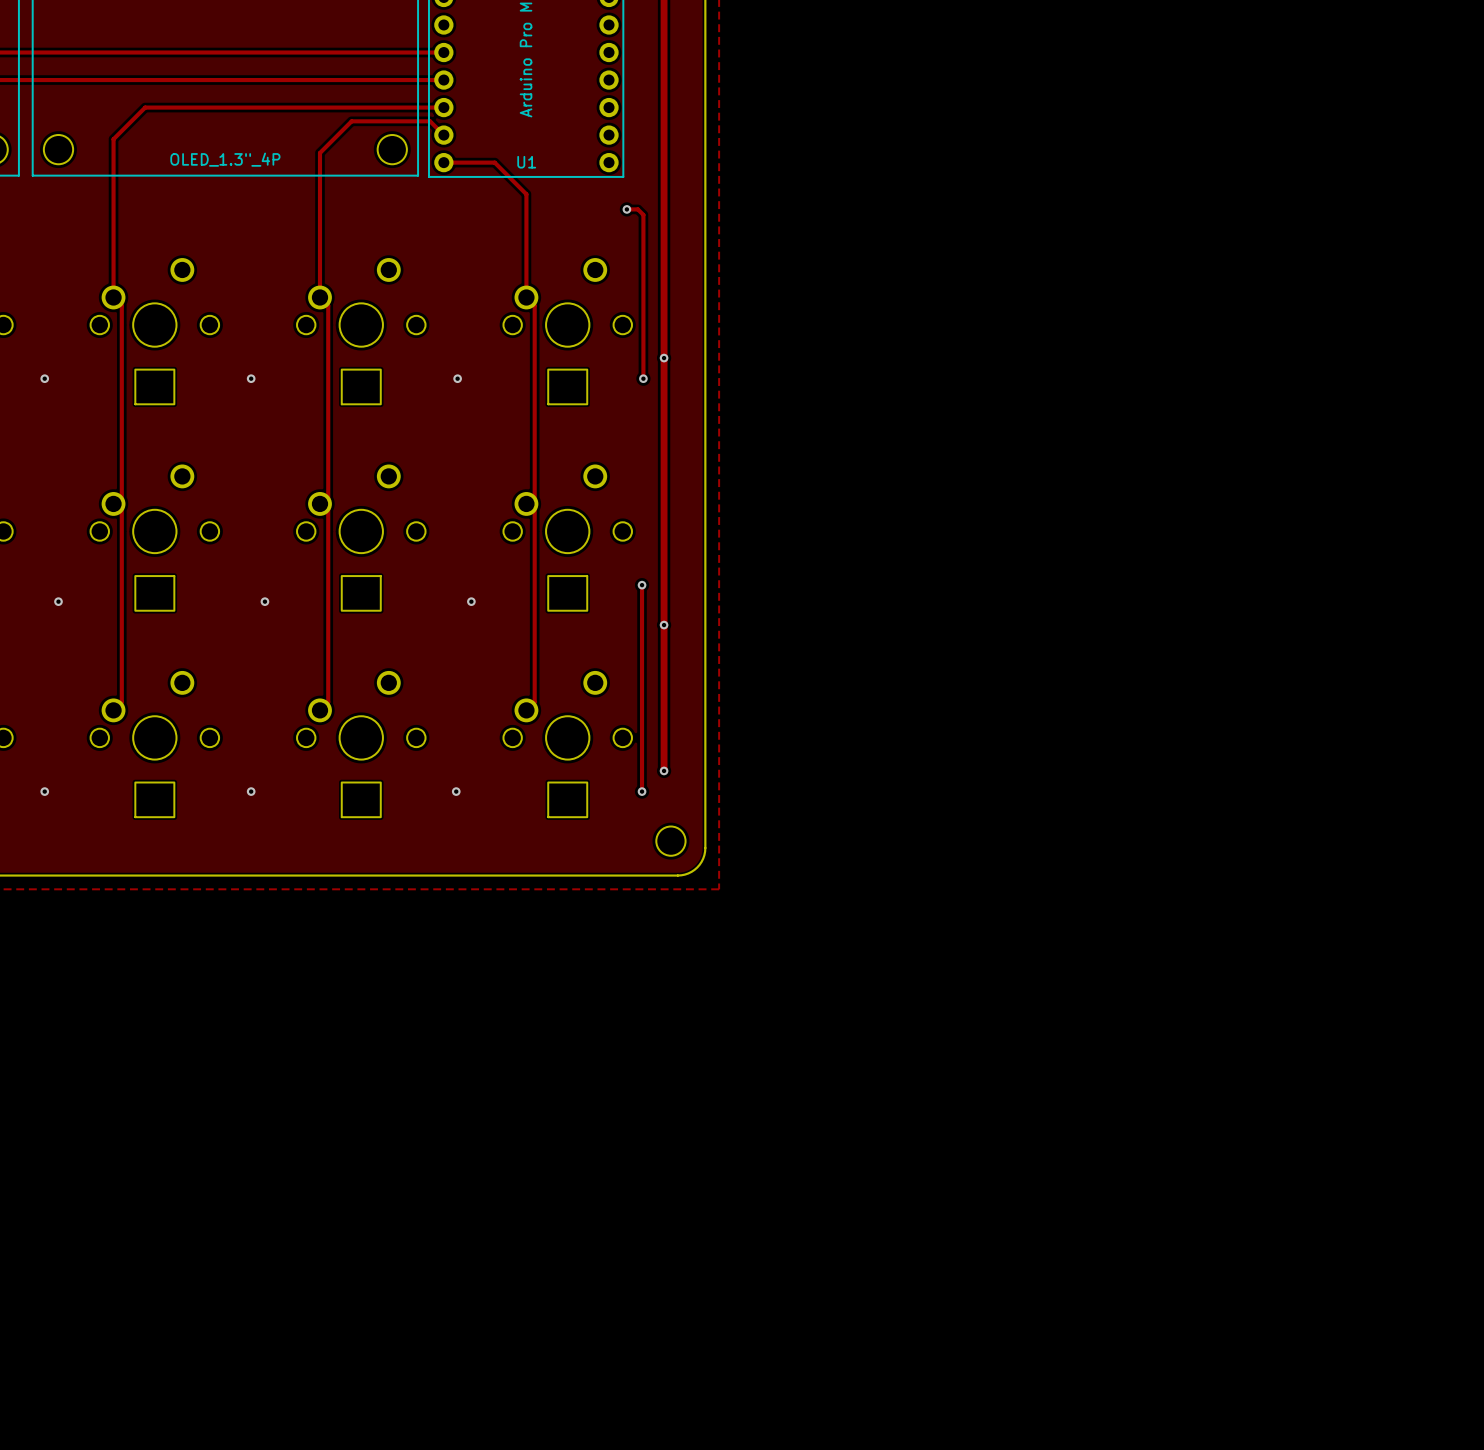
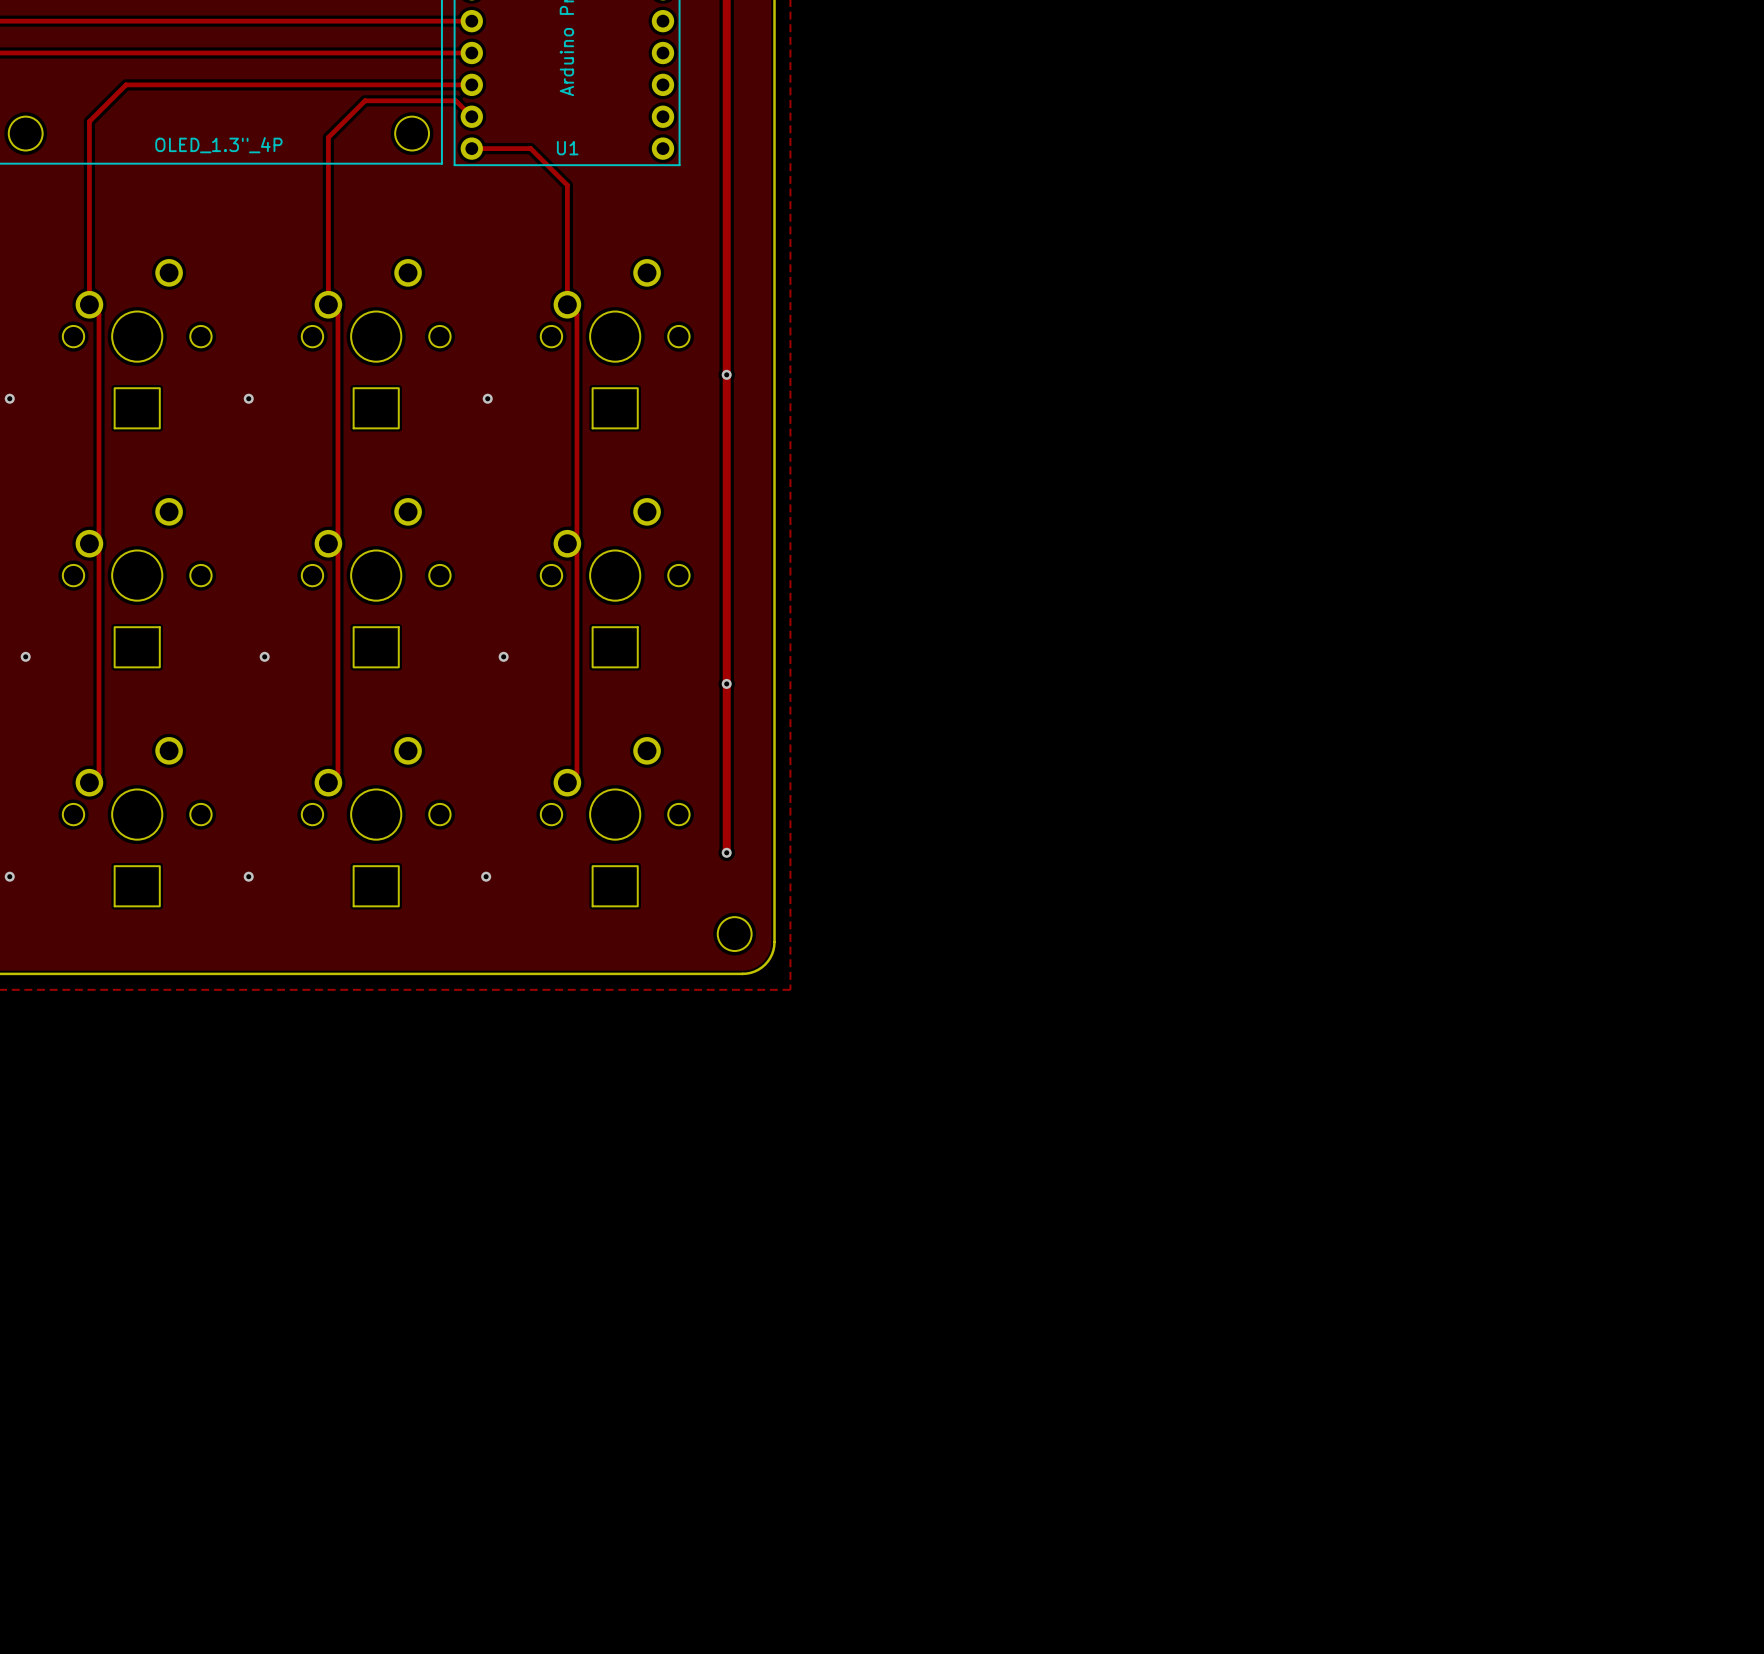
track: (626, 209) (637, 209) (643, 214) (643, 378) -> none
via: (626, 209) -> none
via: (643, 378) -> none
track: (642, 585) (642, 791) -> none
via: (642, 585) -> none
via: (642, 791) -> none

